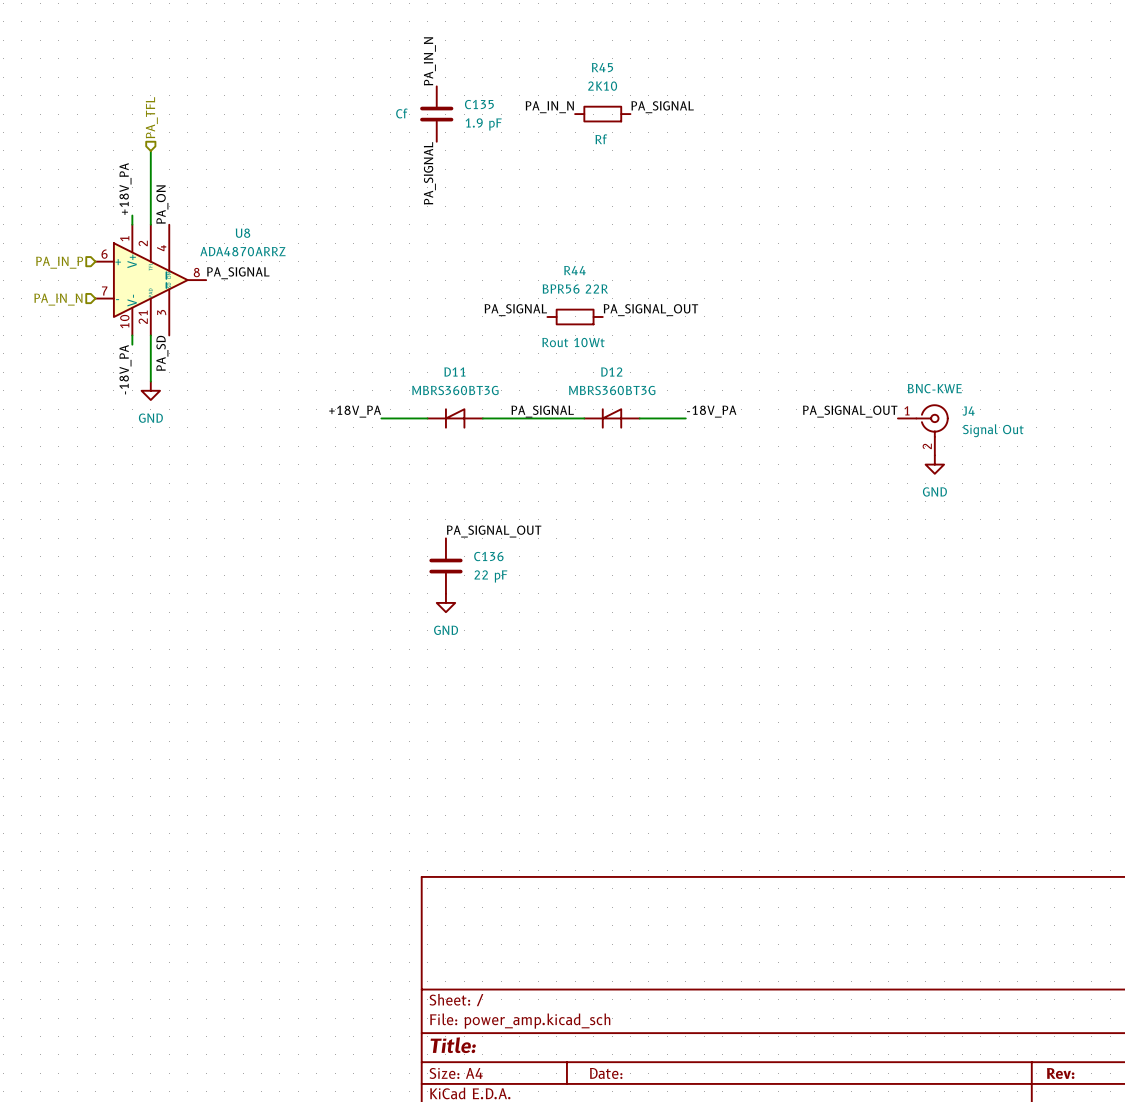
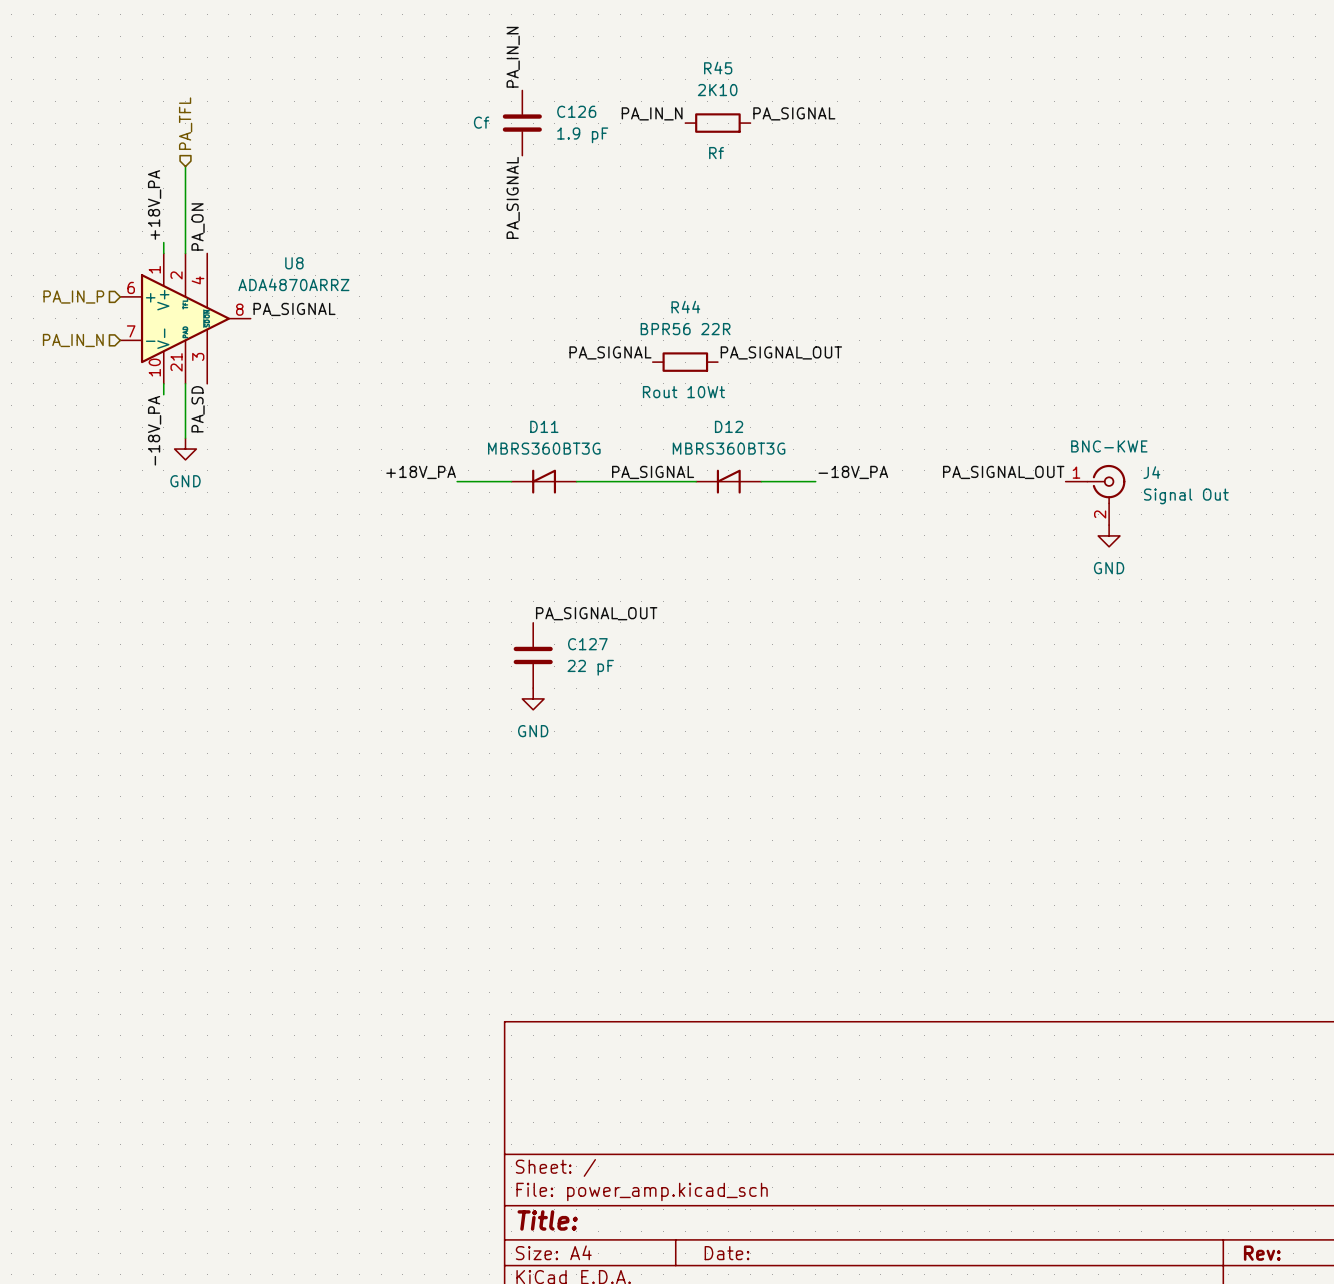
C135 name: C135 (479, 104) -> C126 (576, 111)
C136 name: C136 (488, 556) -> C127 (587, 644)

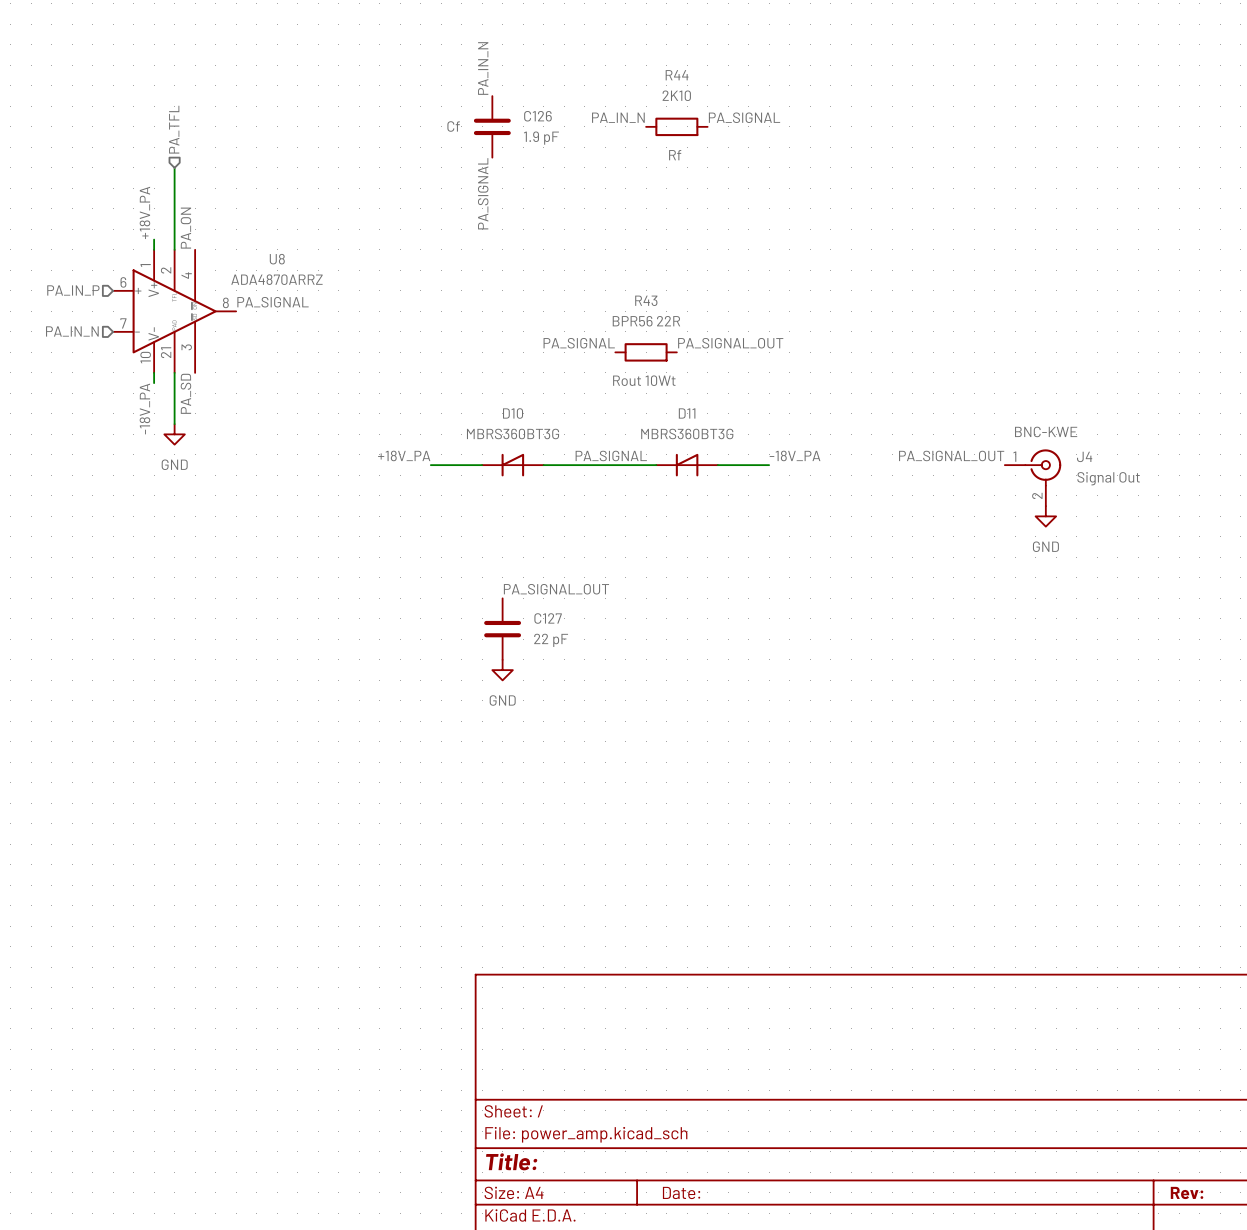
R45 name: R45 (718, 68) -> R44 (677, 75)
R44 name: R44 (685, 307) -> R43 (646, 300)
D11 name: D11 (544, 426) -> D10 (513, 413)
D12 name: D12 (729, 426) -> D11 (687, 413)

